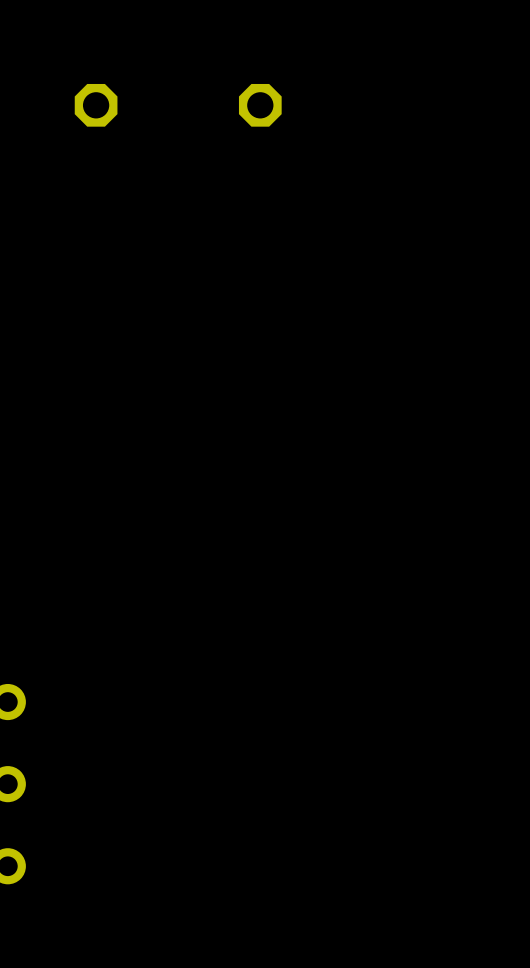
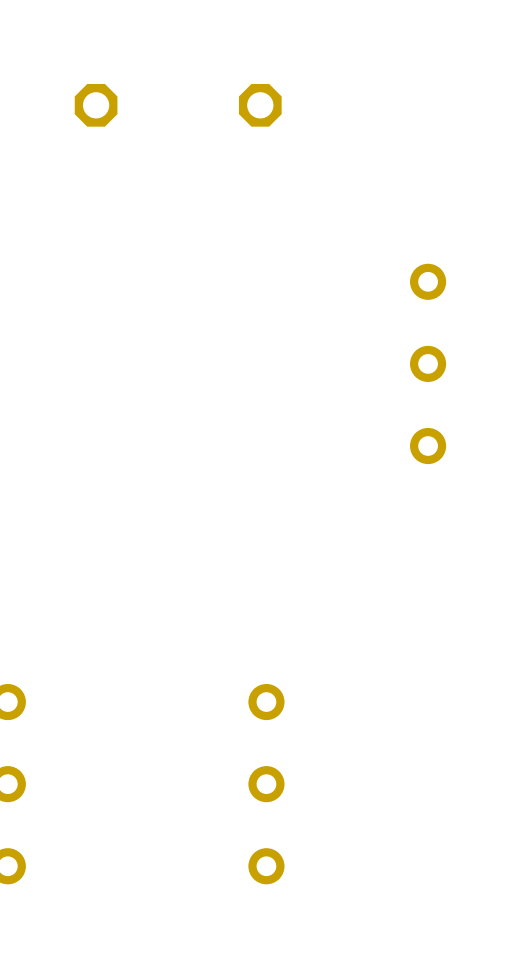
part: none -> (428, 363)
part: none -> (266, 784)

